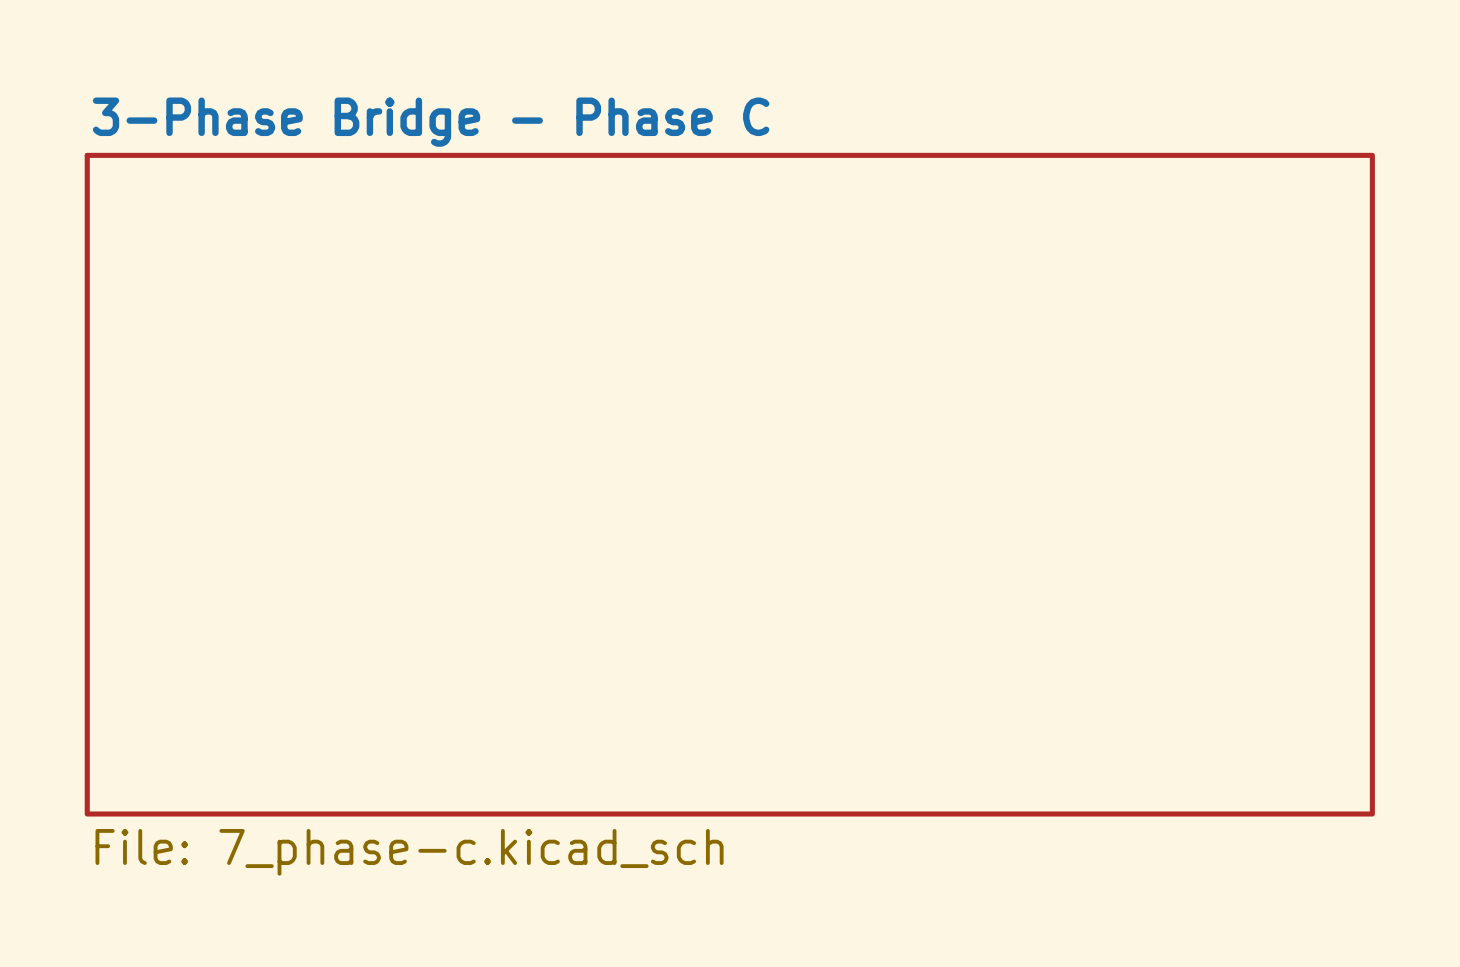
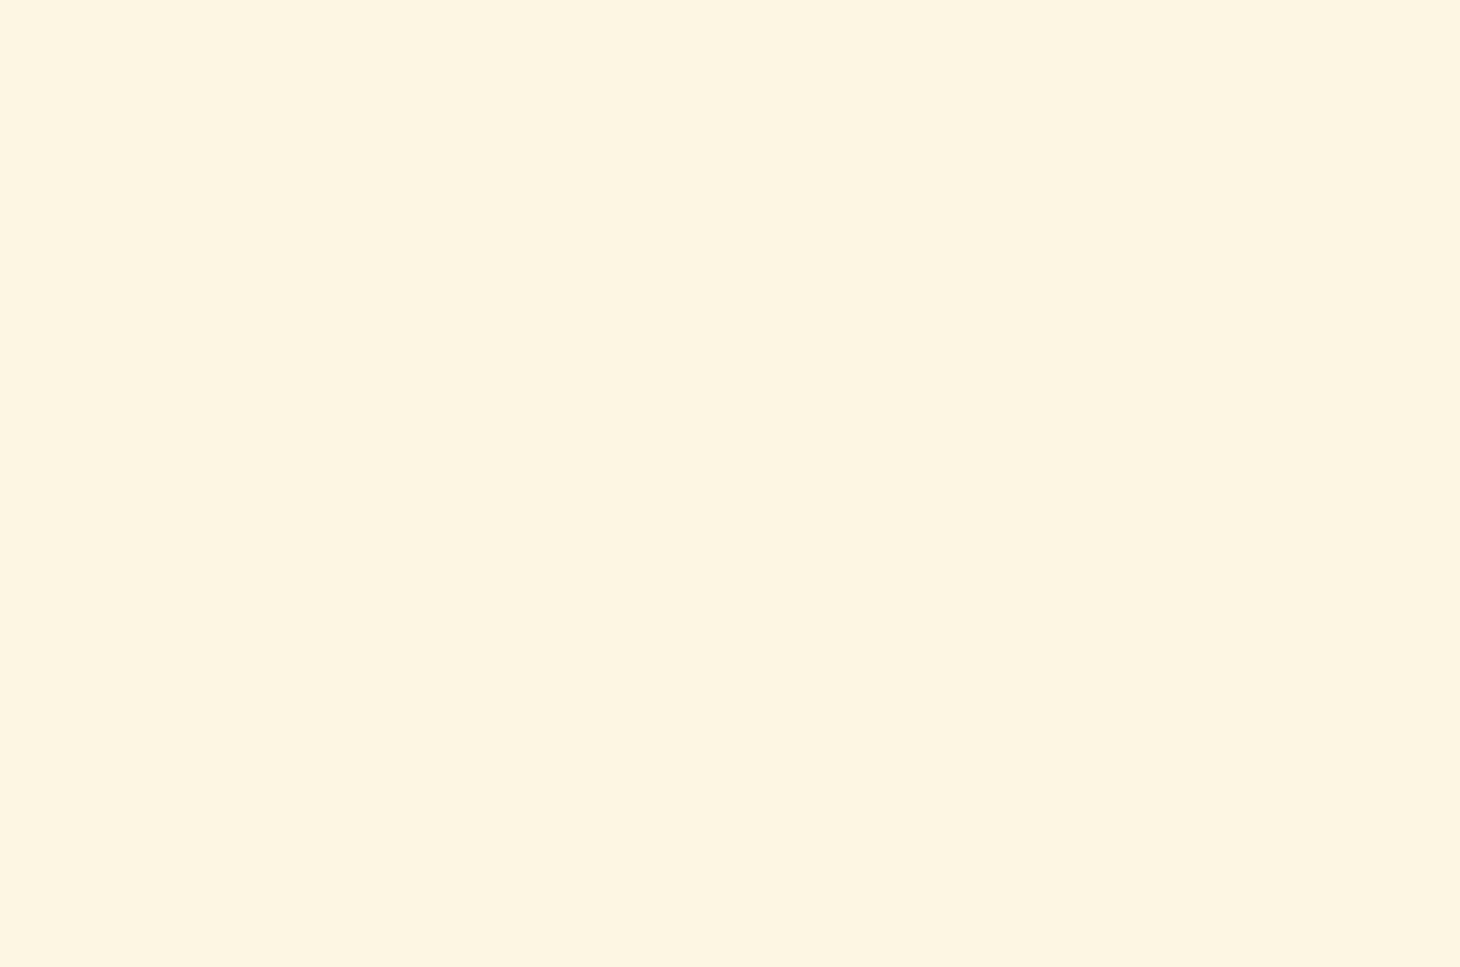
sheet 3-Phase Bridge - Phase C: File: 7_phase-c.kicad_sch (729, 484) -> none

